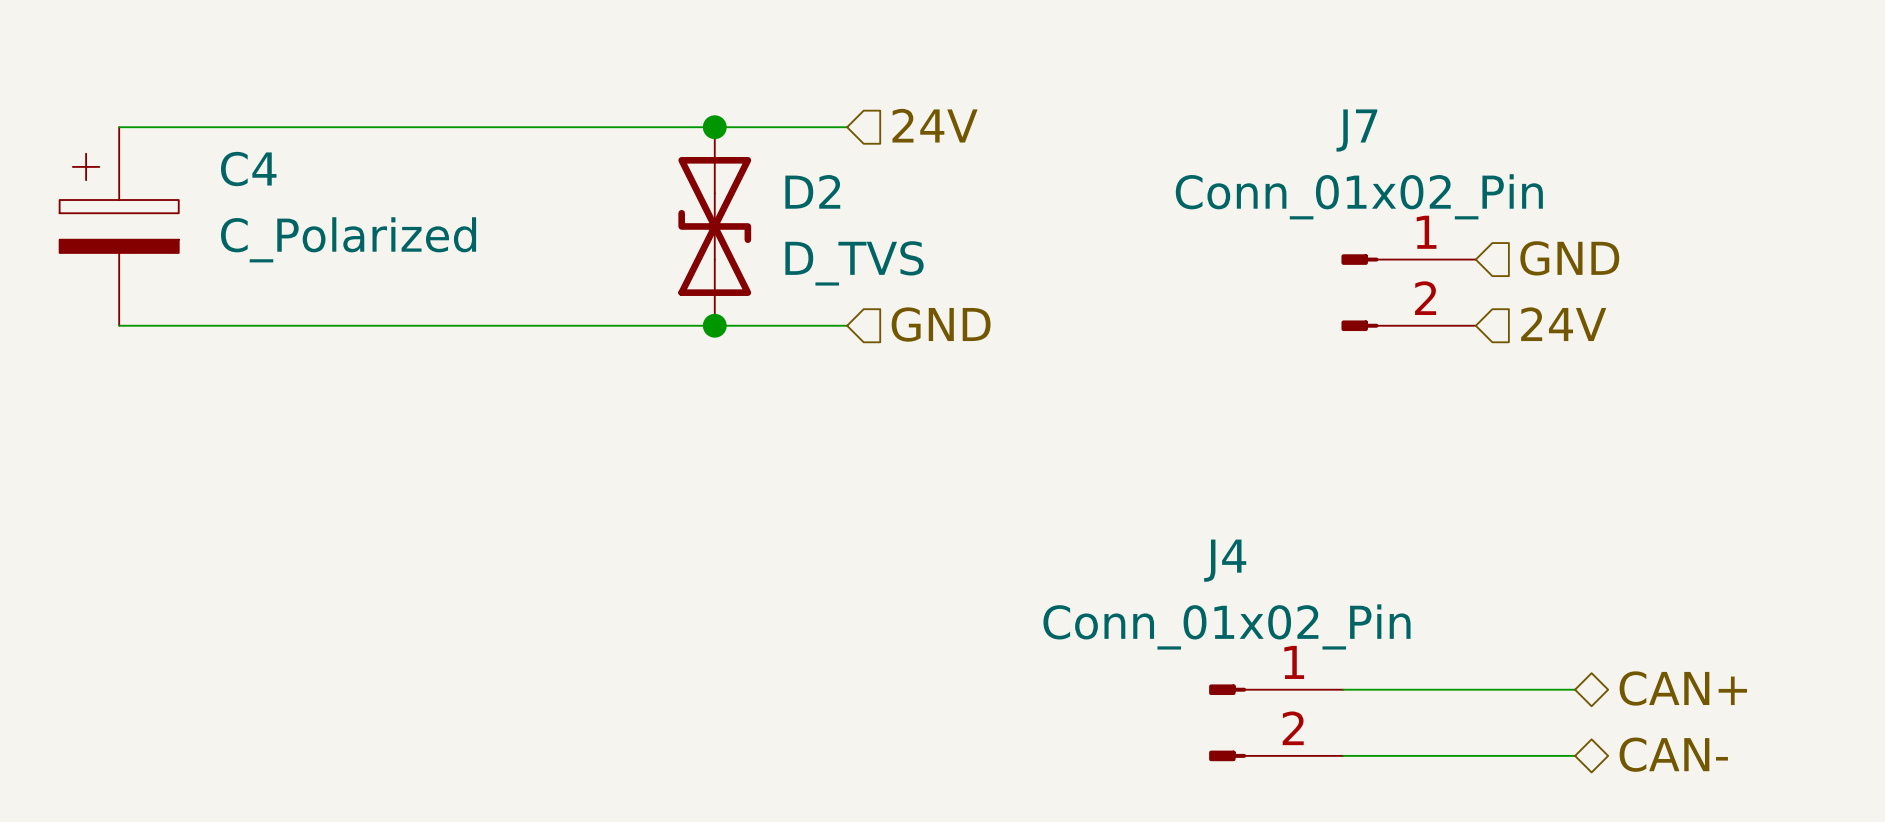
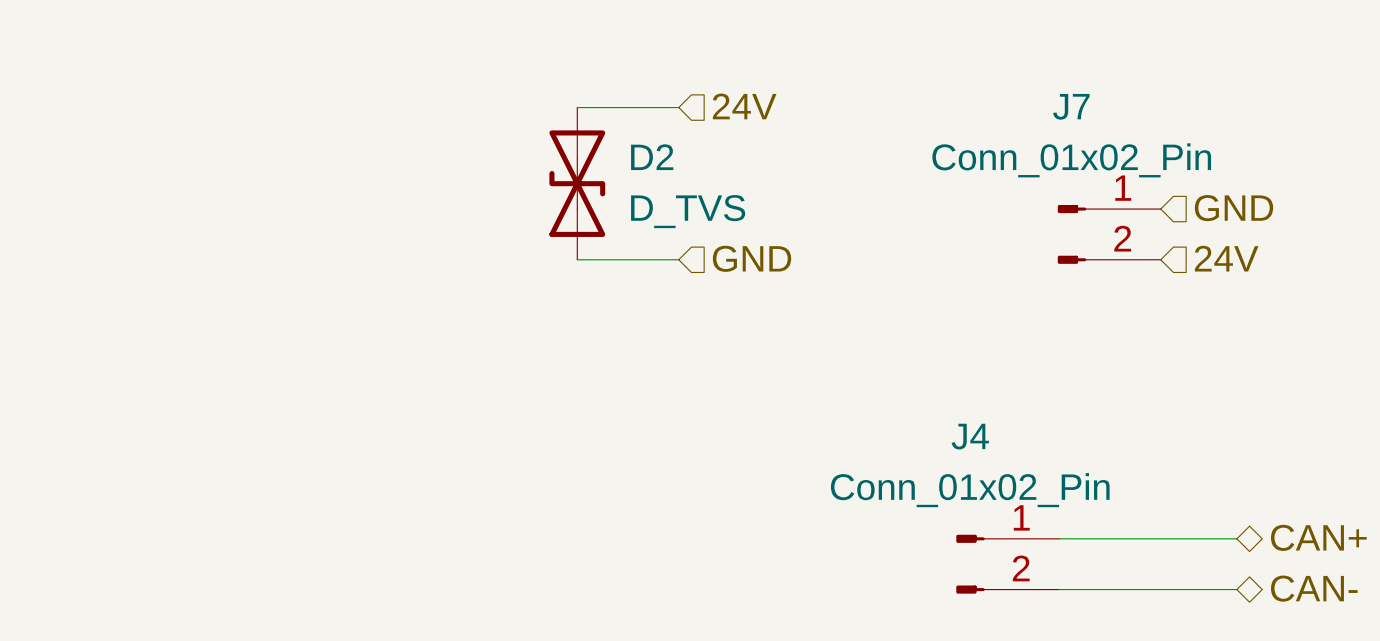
wire: (119, 127) (714, 127) -> none
junction: (714, 127) -> none
C4: C_Polarized (119, 226) -> none
wire: (119, 325) (714, 325) -> none
junction: (714, 325) -> none

